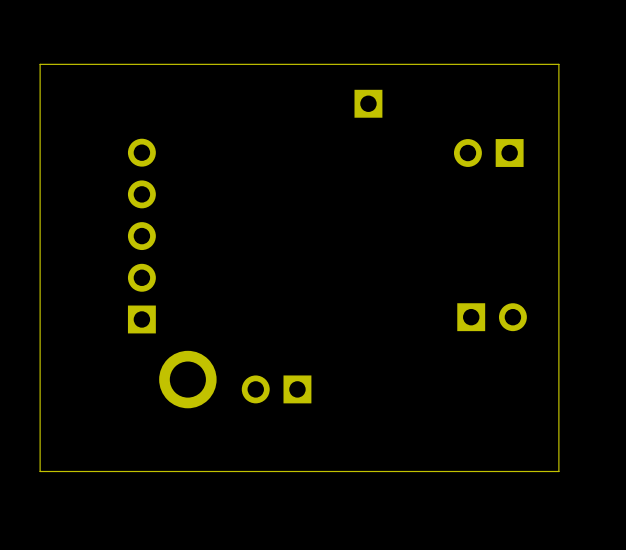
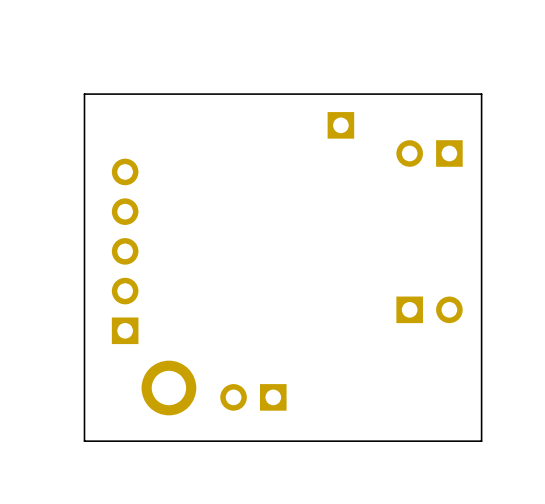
board edge: (558, 64) (40, 64) (40, 471) (558, 471) (558, 64) -> (481, 94) (481, 441) (84, 441) (84, 94) (481, 94)
part position: (488, 153) -> (429, 153)
part position: (492, 317) -> (429, 309)

